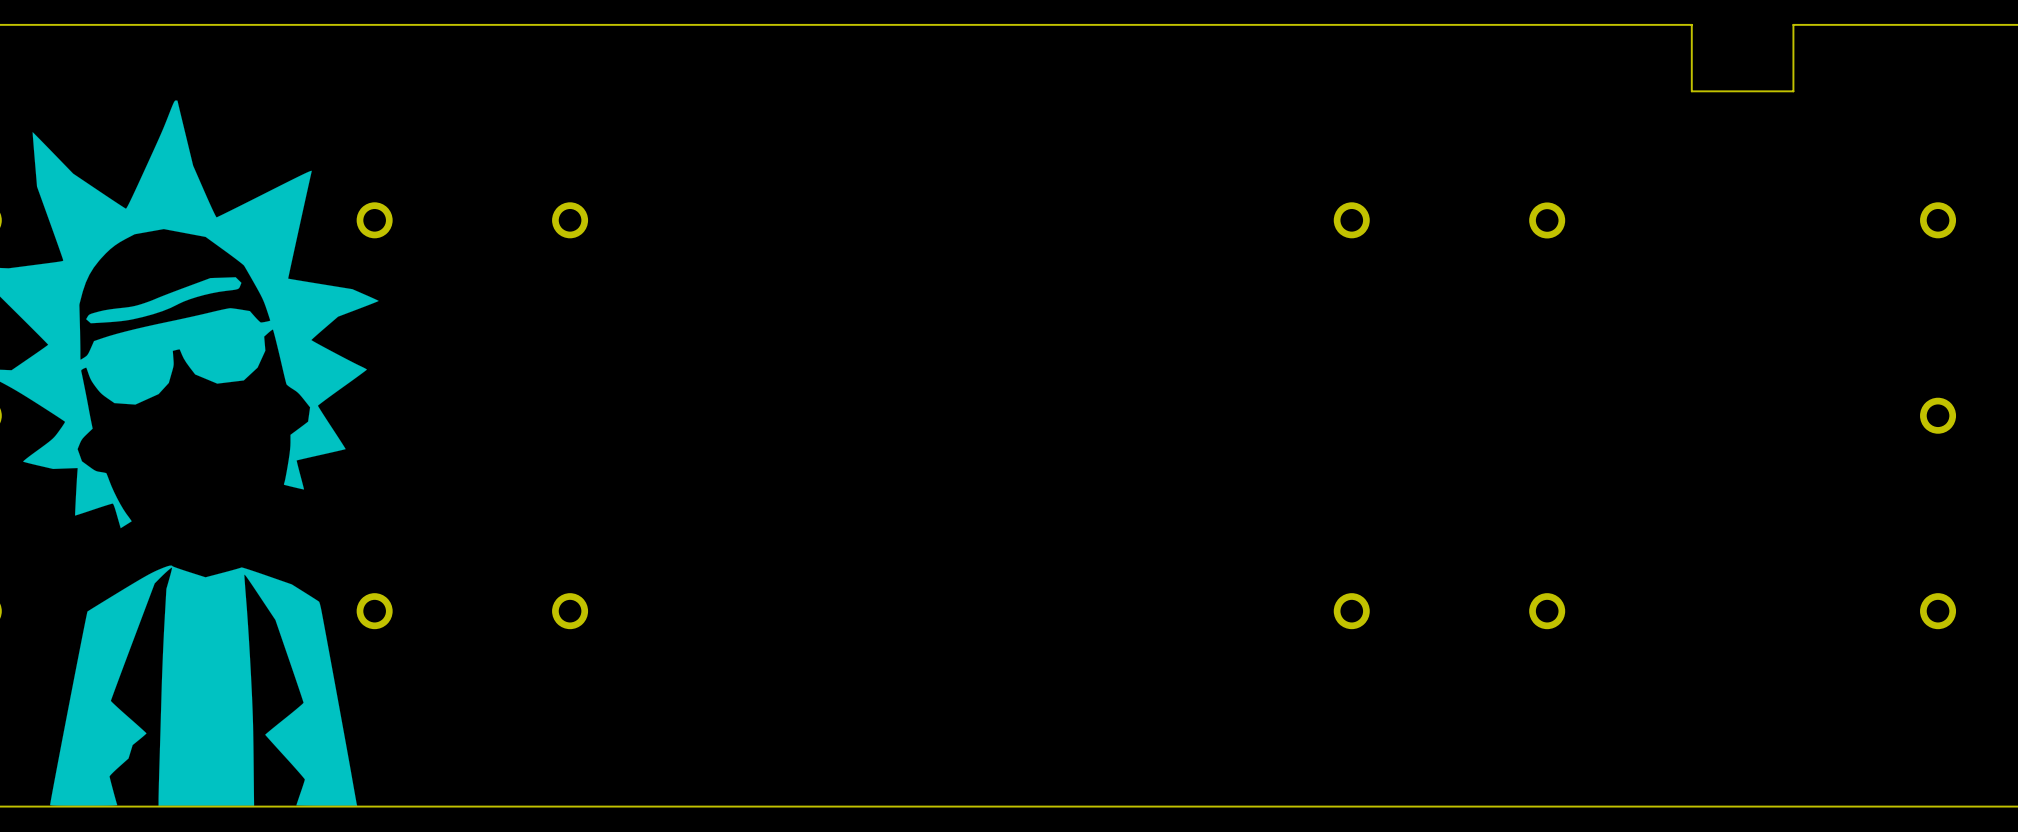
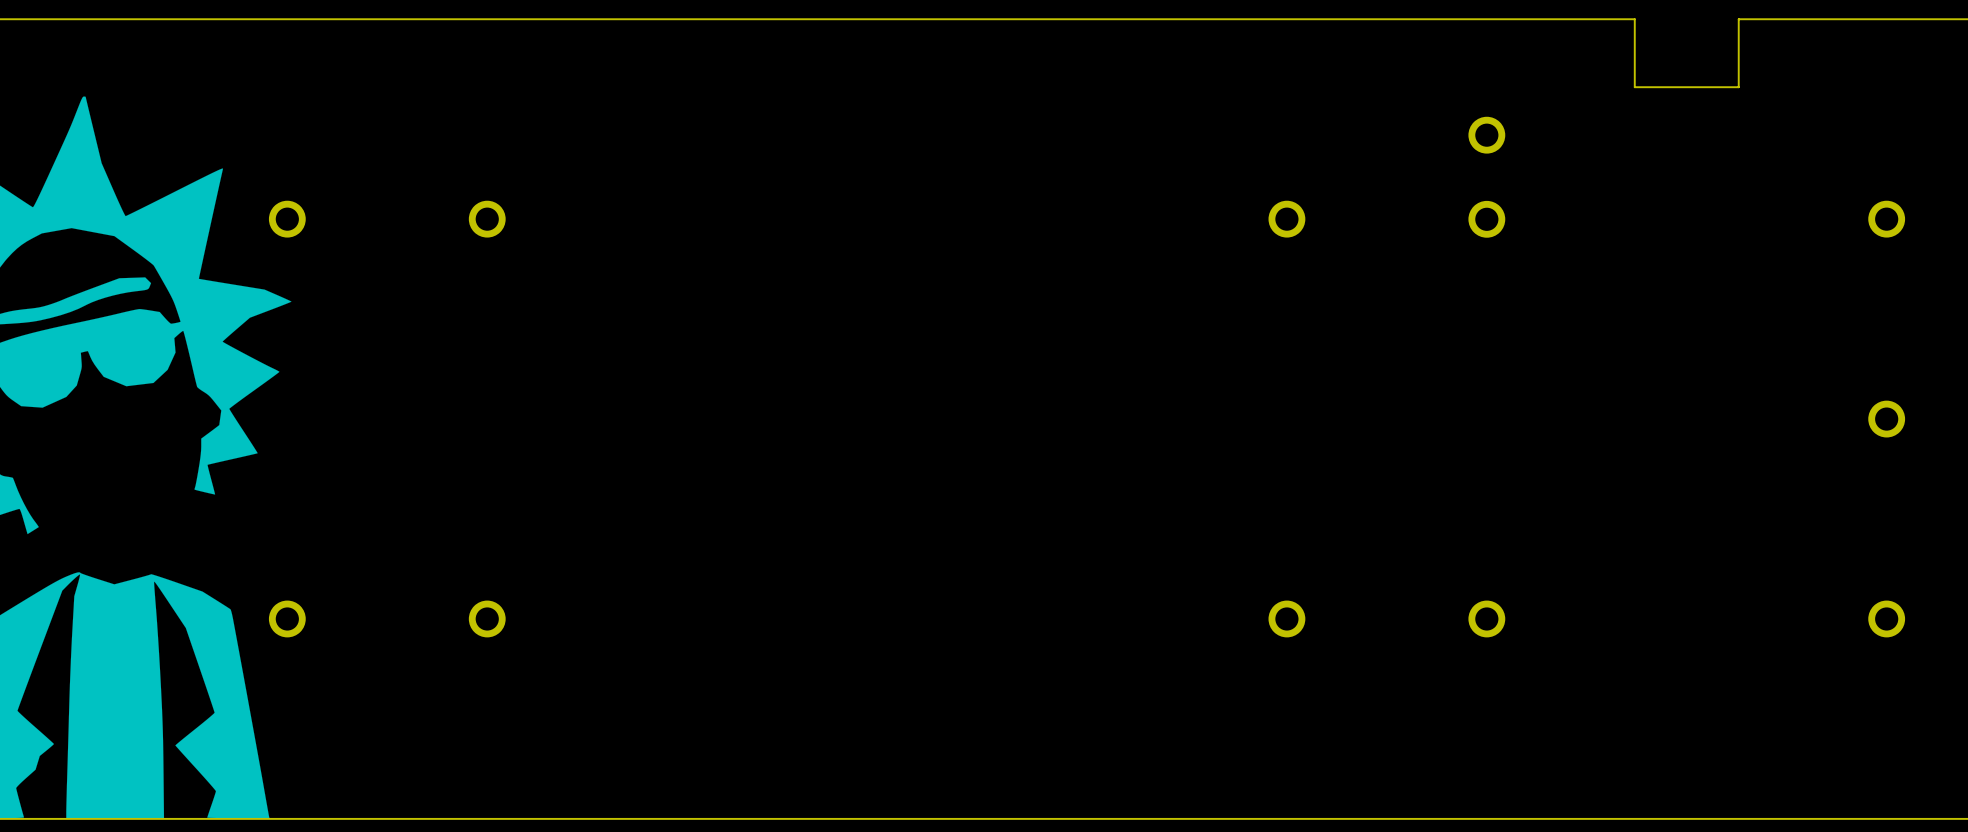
part: none -> (1486, 135)

